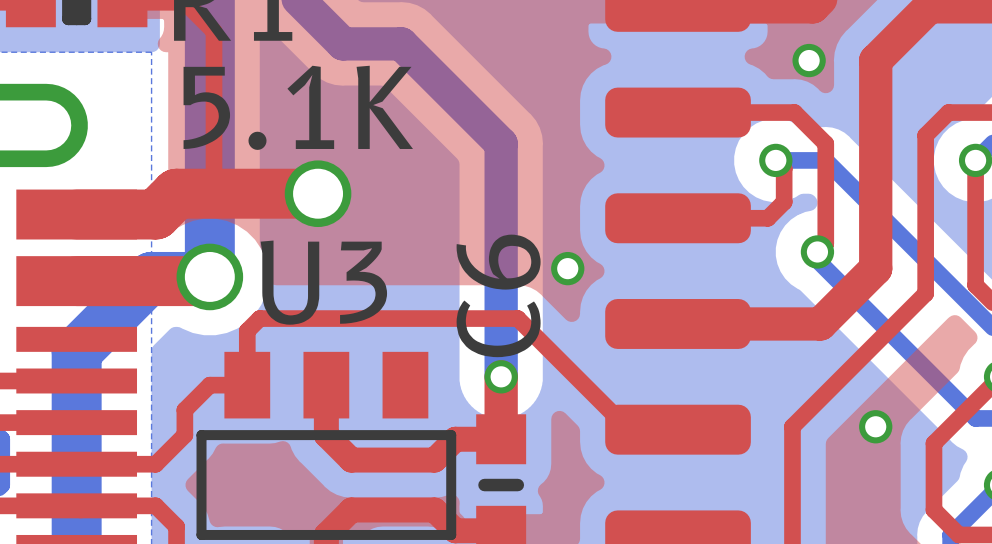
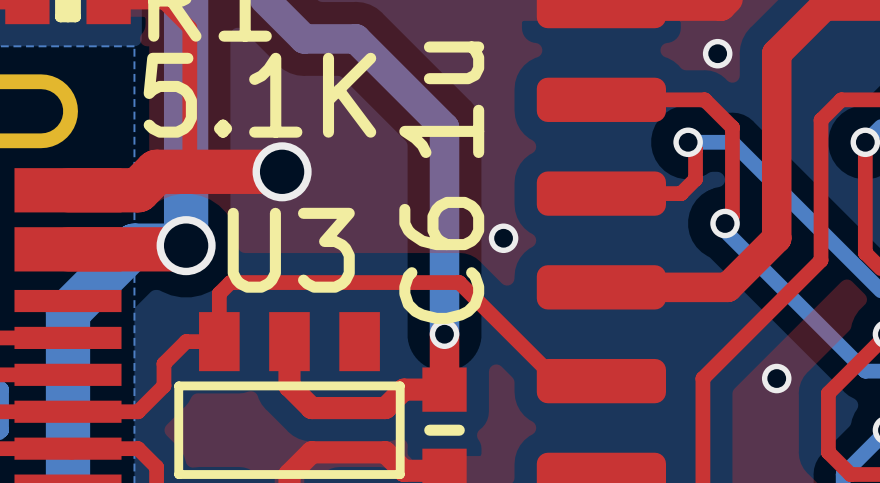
C6 value: none -> 1u (441, 99)

